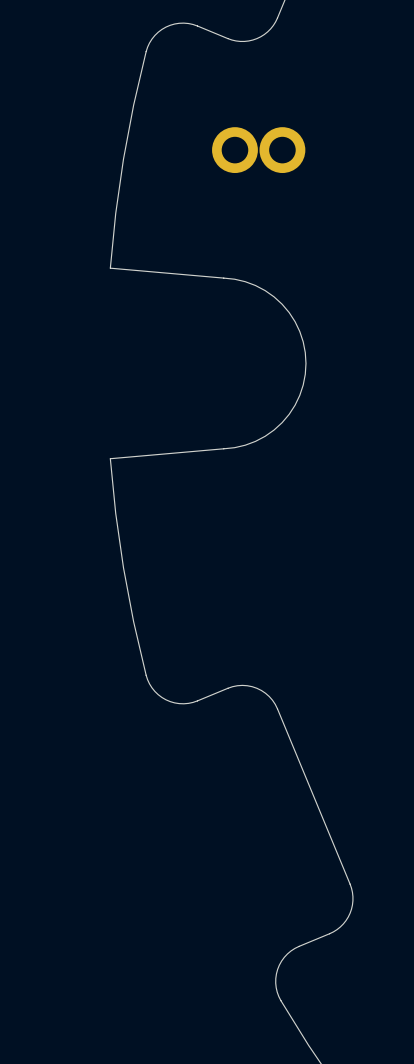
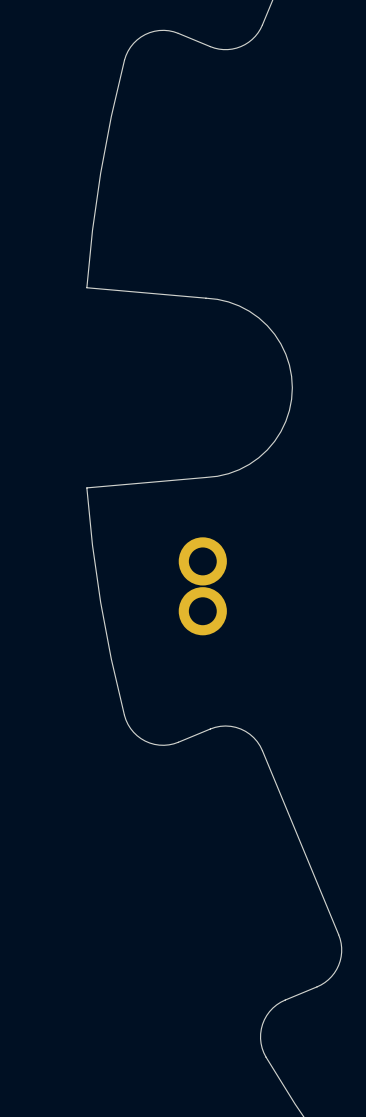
part rotation: 0° (258, 150) -> 90° clockwise (202, 586)
part position: (258, 150) -> (202, 586)

